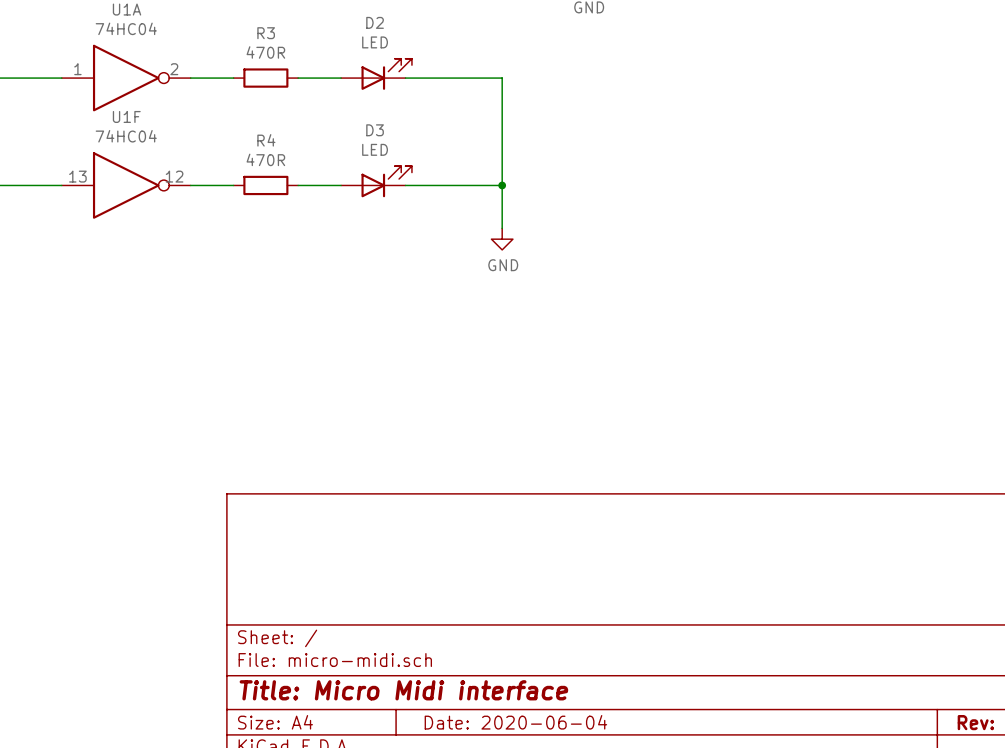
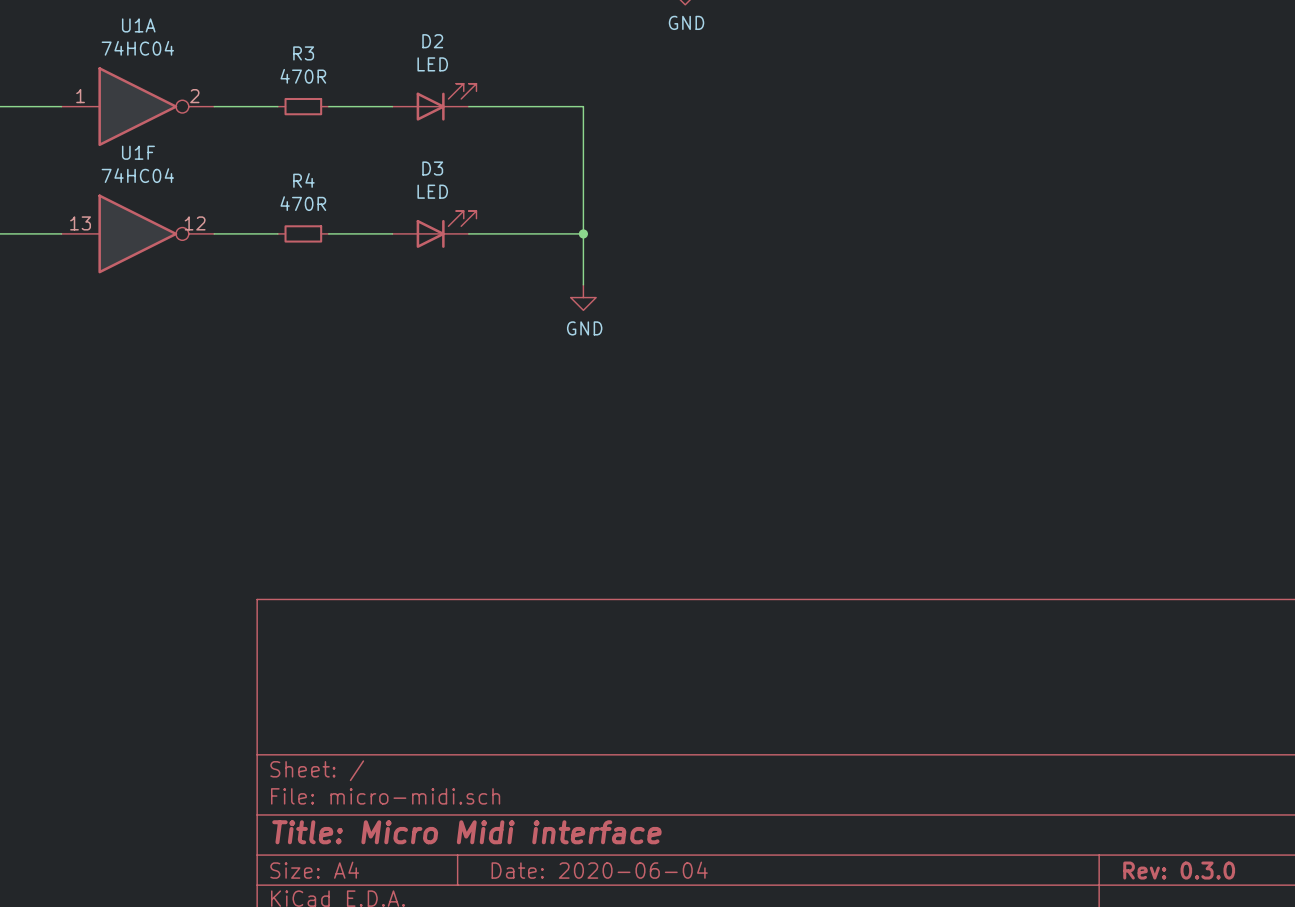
R3 symbol: [233, 68, 299, 88] -> [277, 97, 329, 116]
R4 symbol: [233, 175, 299, 196] -> [277, 225, 329, 243]

